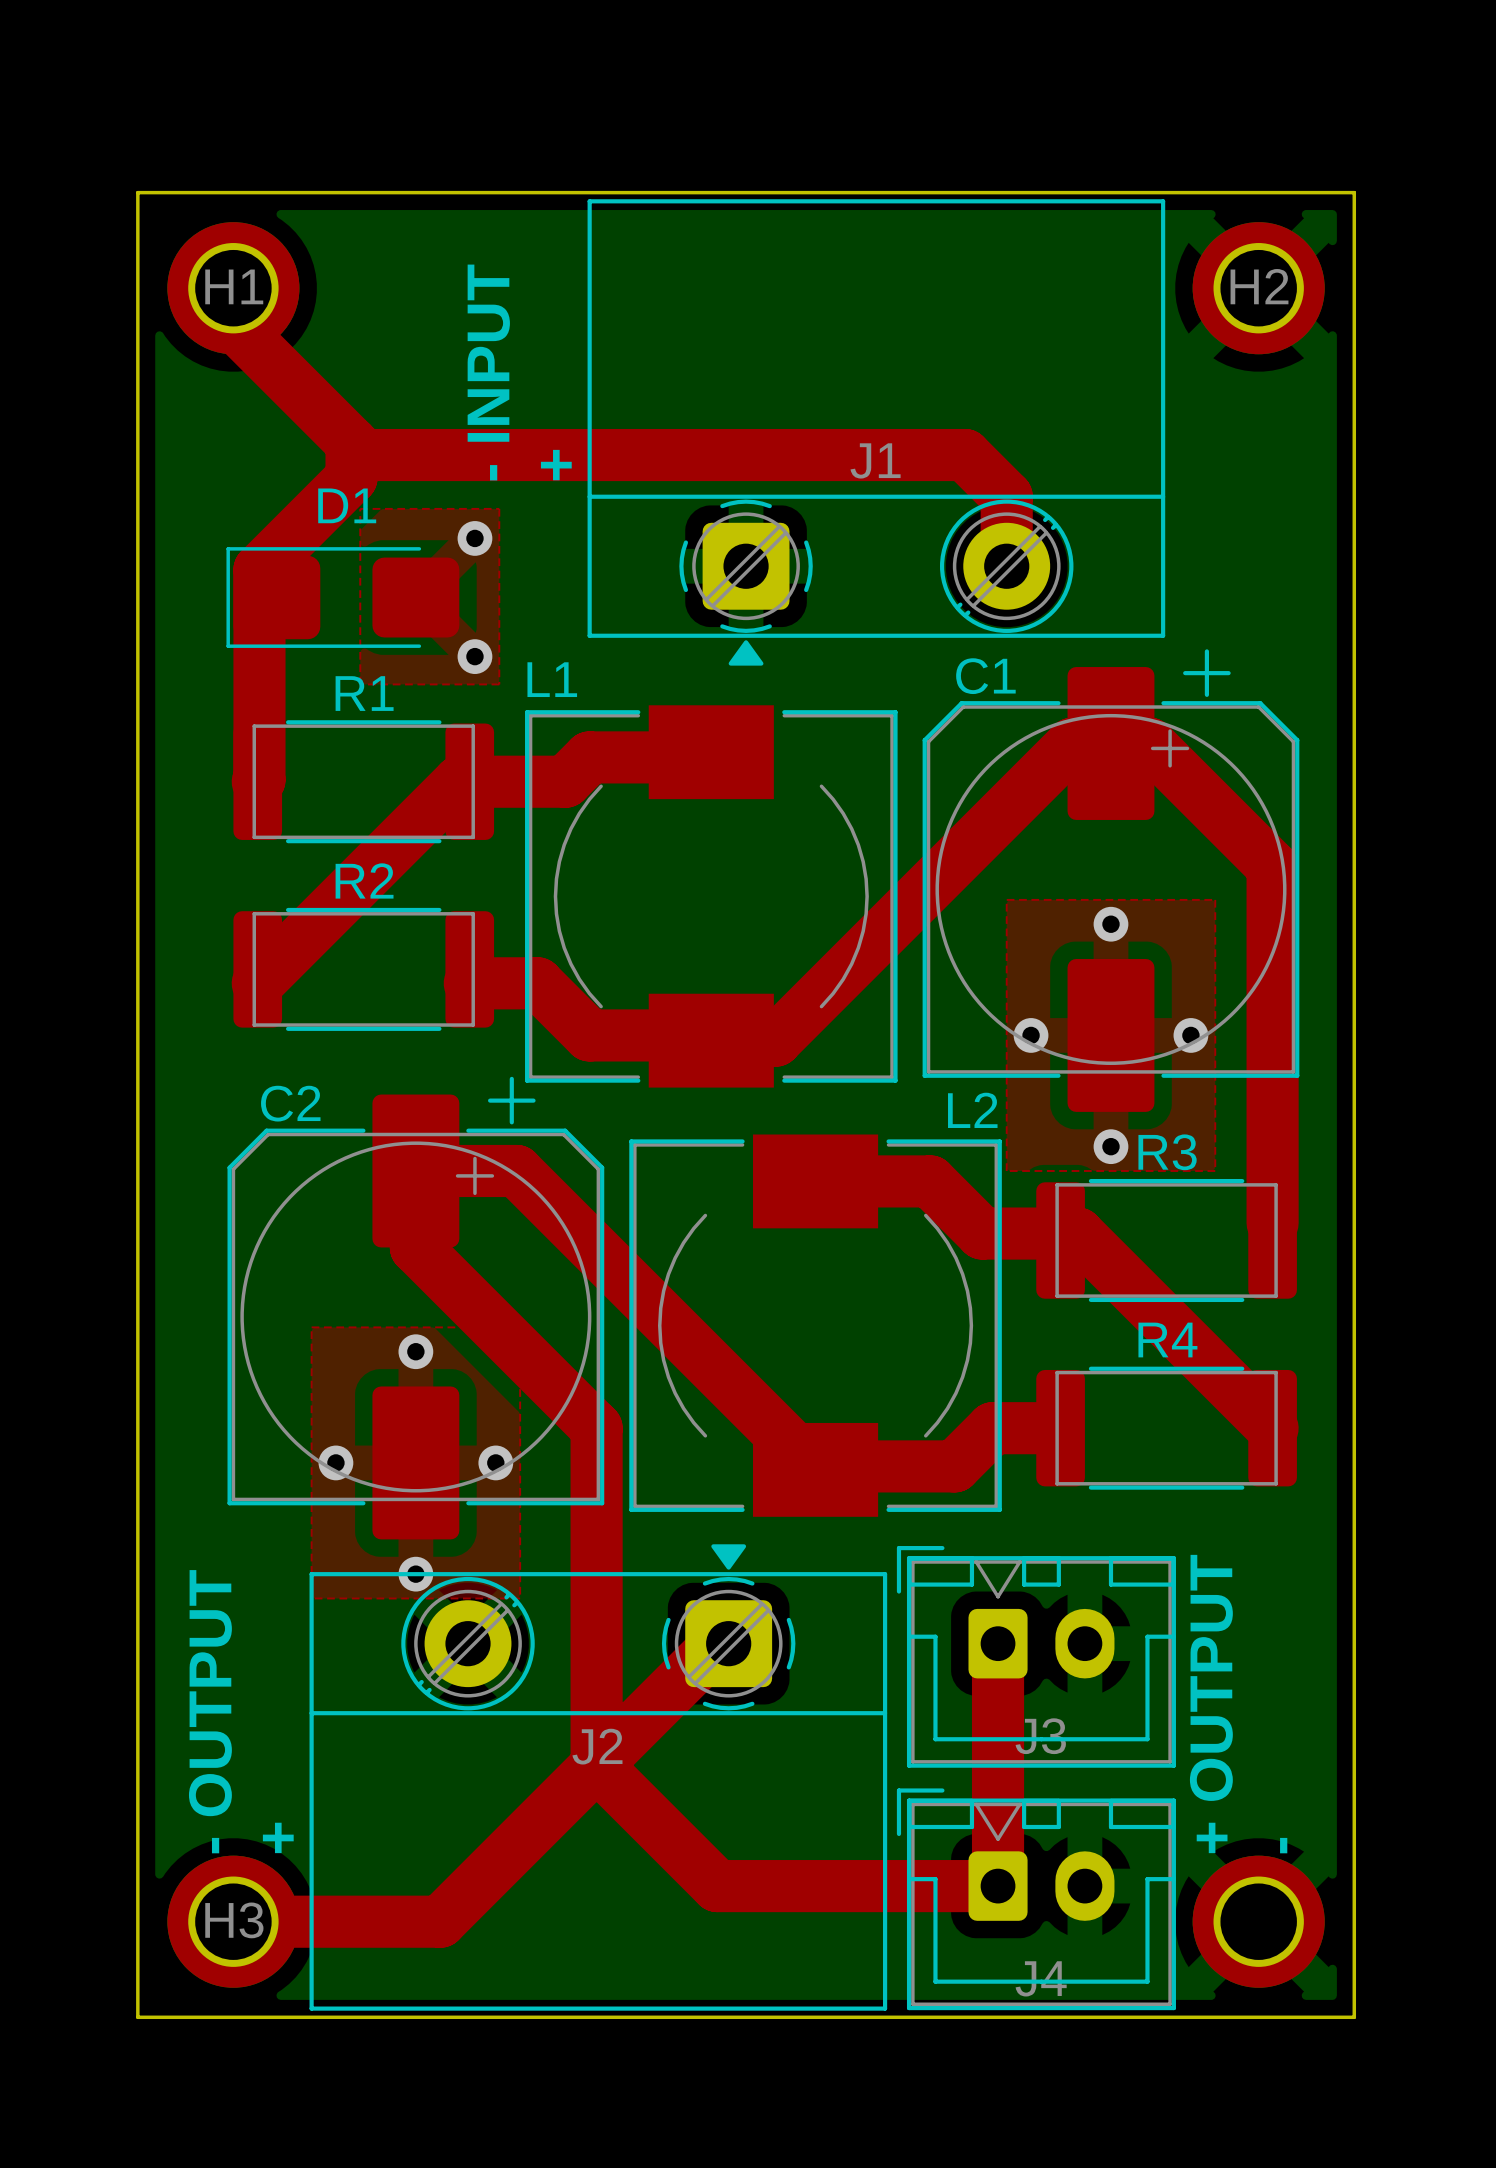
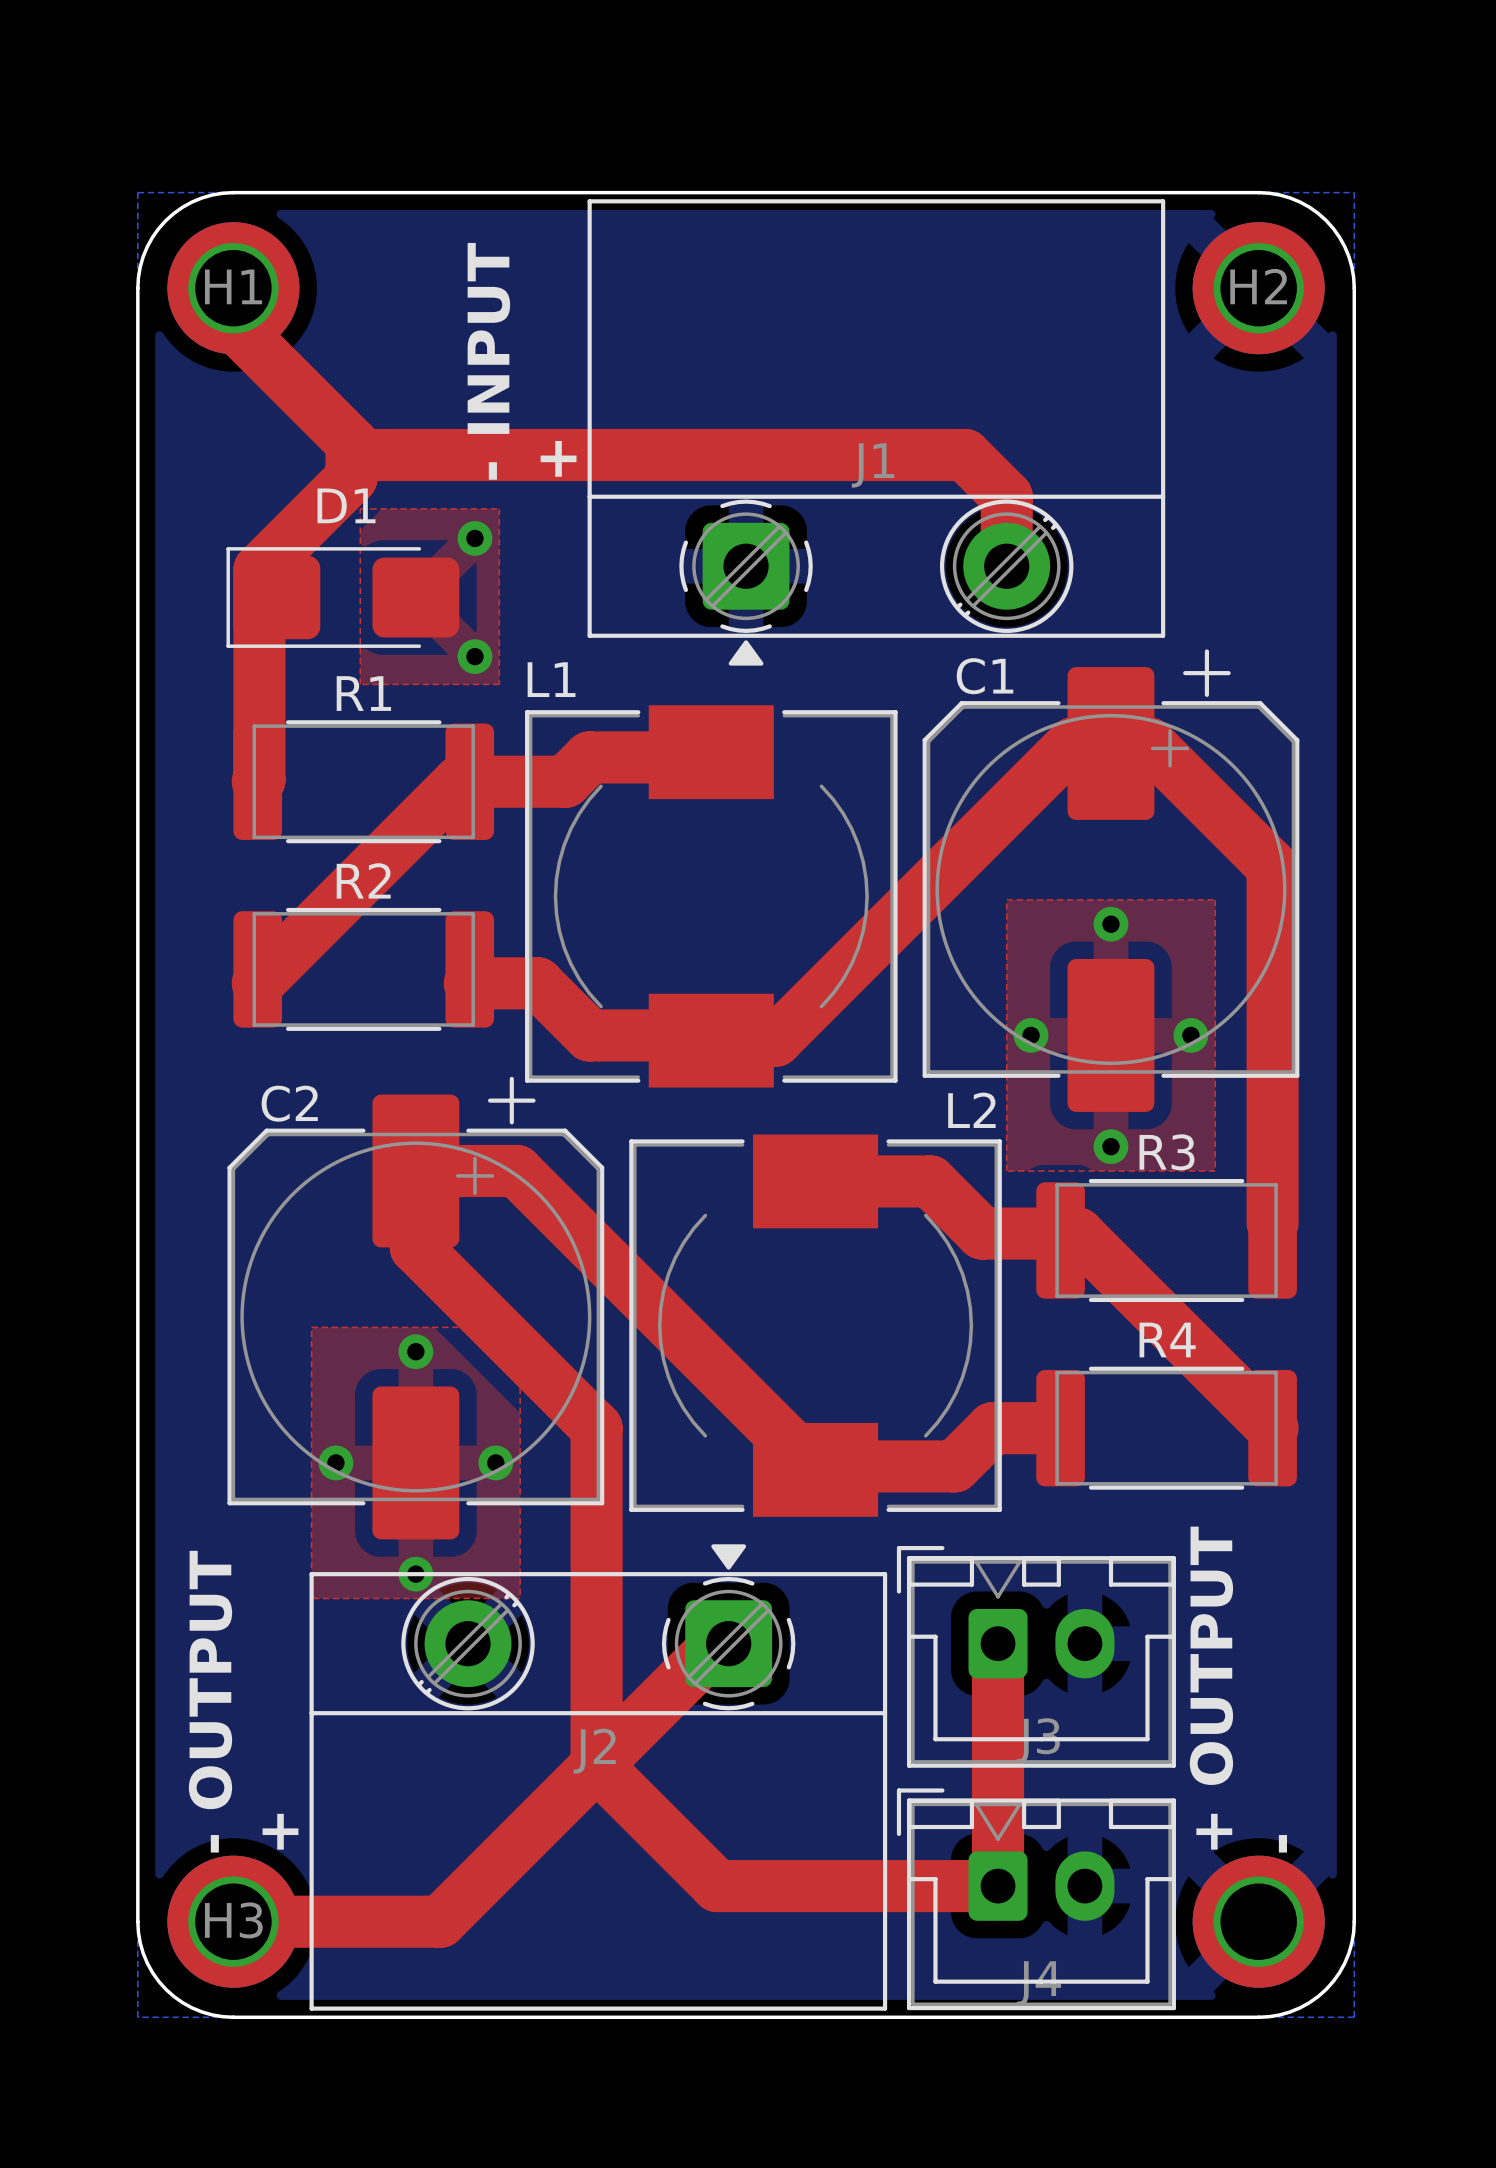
board edge: (233, 192) (137, 192) (137, 288) -> (233, 192) (201, 197) (182, 207) (165, 220) (152, 237) (143, 256) (137, 288)
board edge: (1258, 192) (1354, 192) (1354, 288) -> (1258, 192) (1290, 197) (1309, 207) (1326, 220) (1339, 237) (1348, 256) (1354, 288)
board edge: (137, 1921) (137, 2017) (233, 2017) -> (137, 1921) (140, 1942) (147, 1963) (165, 1989) (182, 2002) (201, 2011) (233, 2017)
board edge: (1354, 1921) (1354, 2017) (1258, 2017) -> (1354, 1921) (1348, 1953) (1339, 1972) (1326, 1989) (1300, 2007) (1279, 2014) (1258, 2017)

